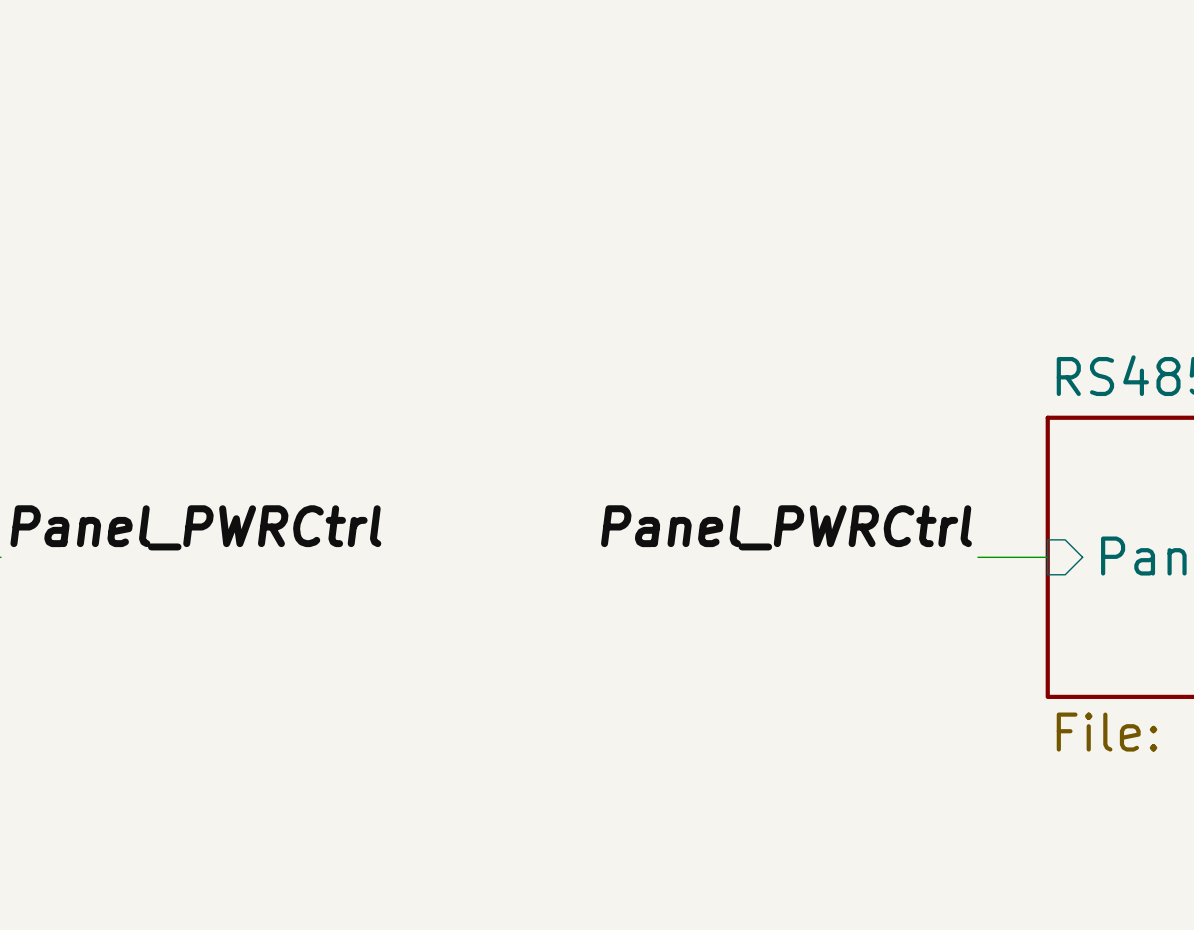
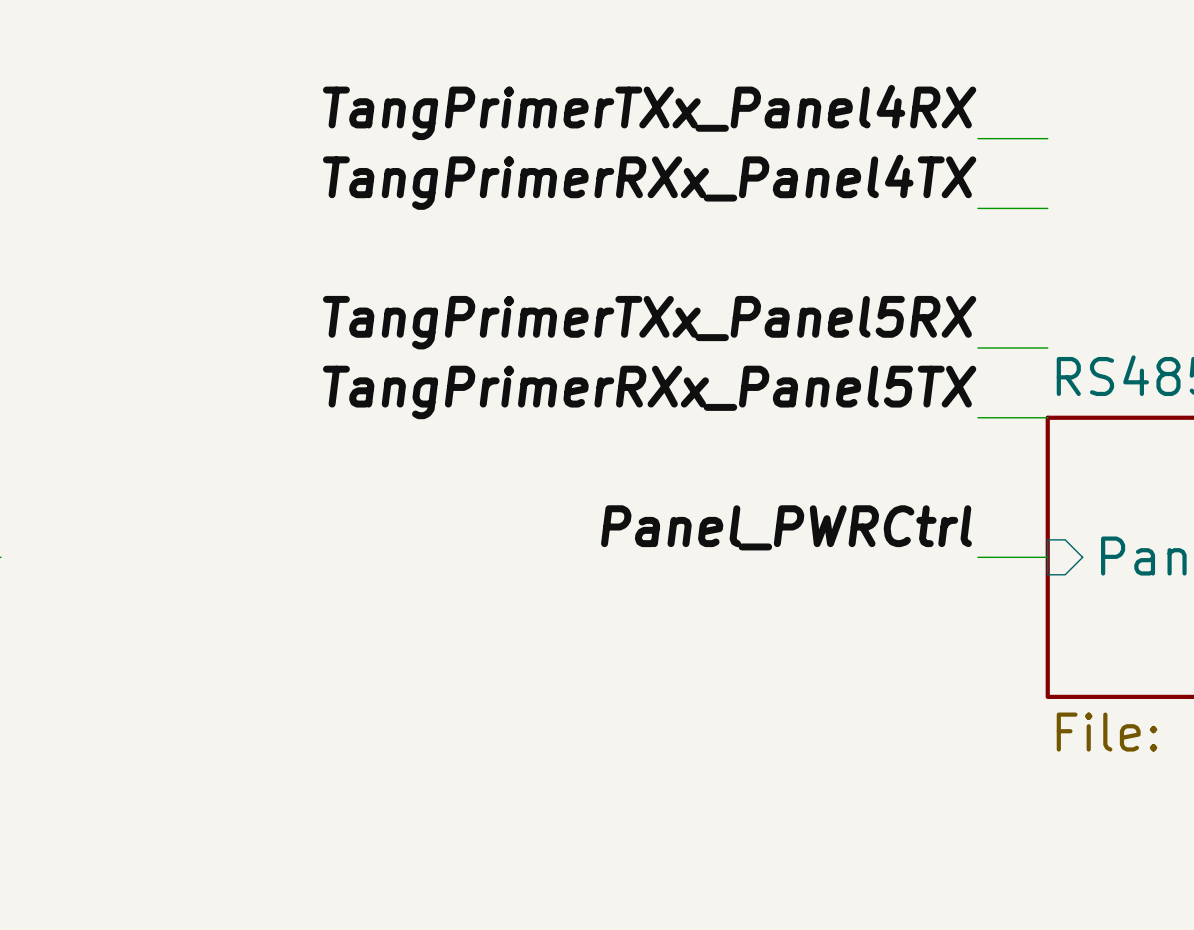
label: none -> TangPrimerTXx_Panel4RX (649, 112)
wire: none -> (977, 138) (1047, 138)
label: none -> TangPrimerRXx_Panel4TX (649, 182)
wire: none -> (977, 208) (1047, 208)
label: none -> TangPrimerTXx_Panel5RX (649, 322)
wire: none -> (977, 347) (1047, 347)
label: none -> TangPrimerRXx_Panel5TX (649, 392)
wire: none -> (977, 417) (1047, 417)
label: Panel_PWRCtrl (195, 527) -> none

